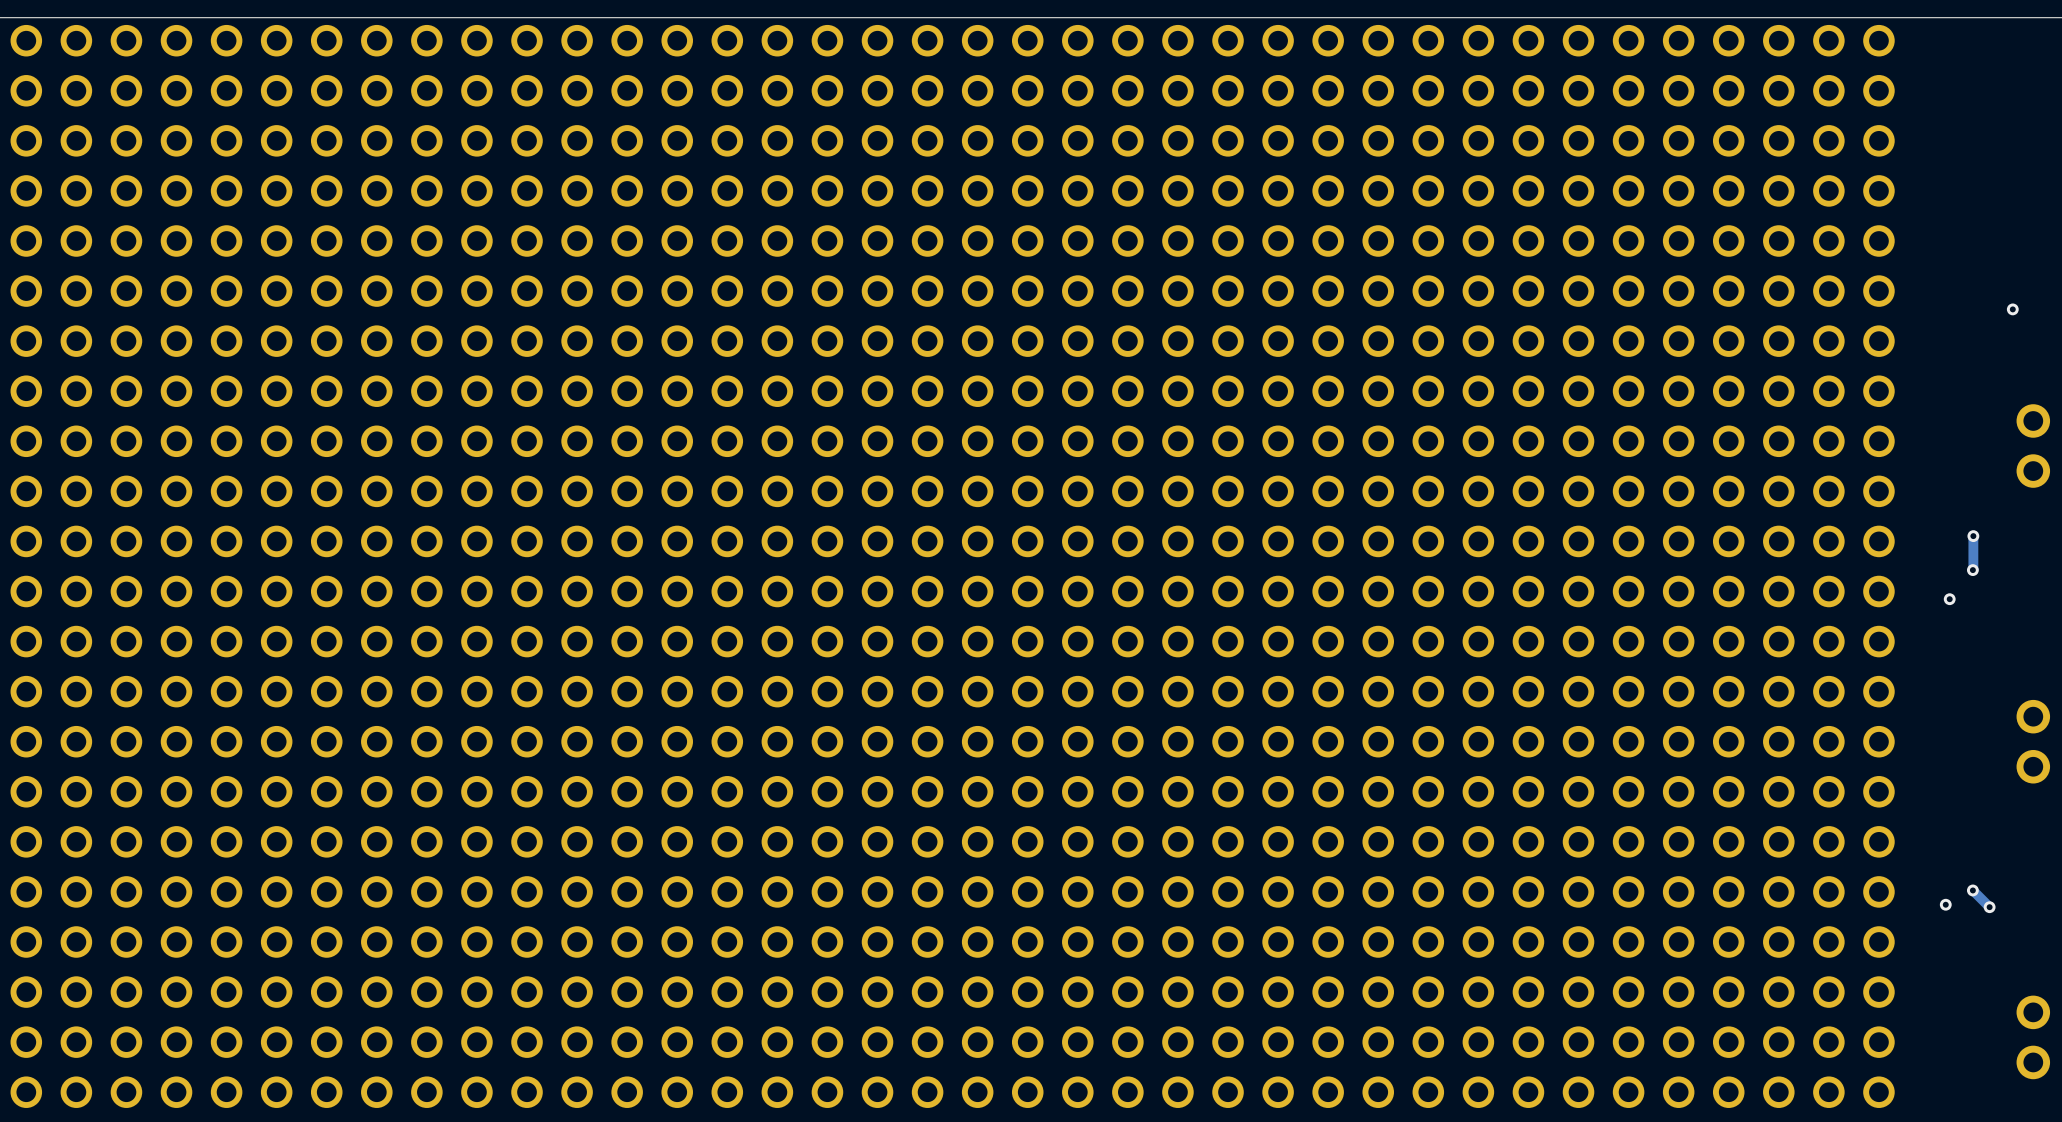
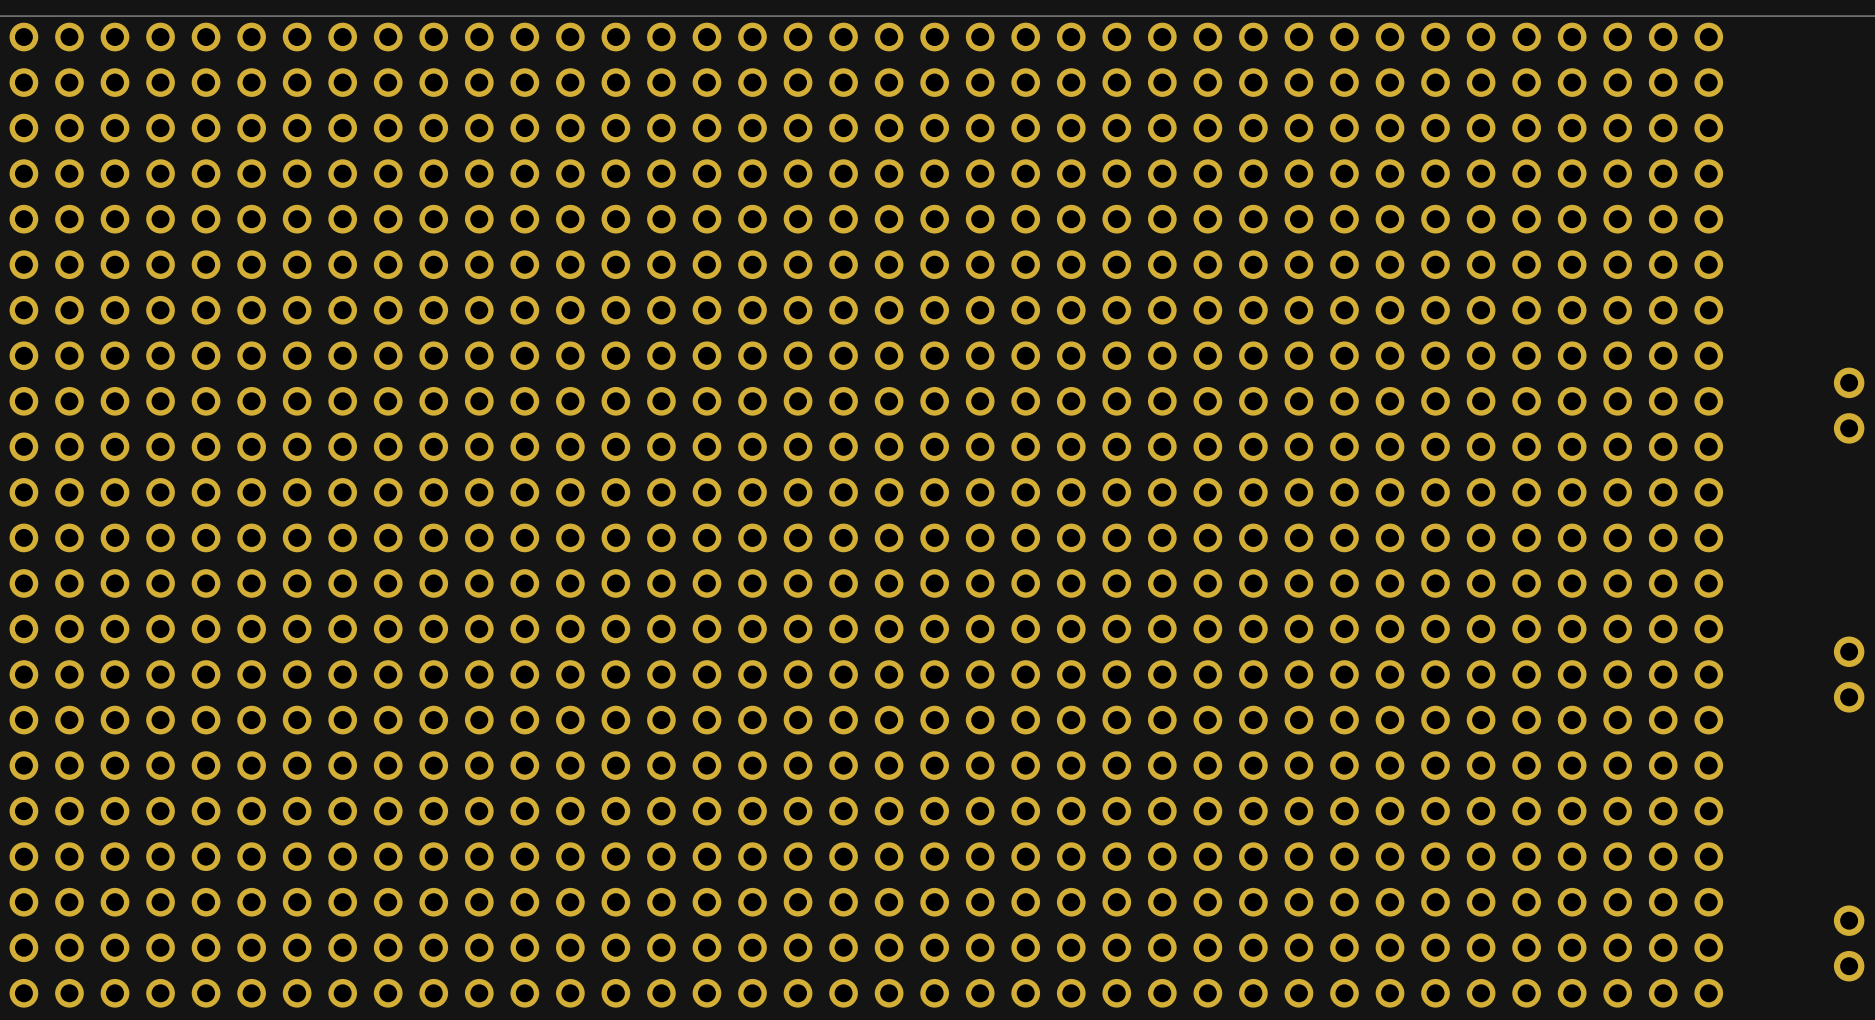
via: (2012, 309) -> none
track: (1973, 536) (1972, 570) -> none
via: (1973, 536) -> none
via: (1972, 570) -> none
via: (1949, 599) -> none
track: (1972, 890) (1989, 907) -> none
via: (1972, 890) -> none
via: (1945, 904) -> none
via: (1989, 907) -> none

